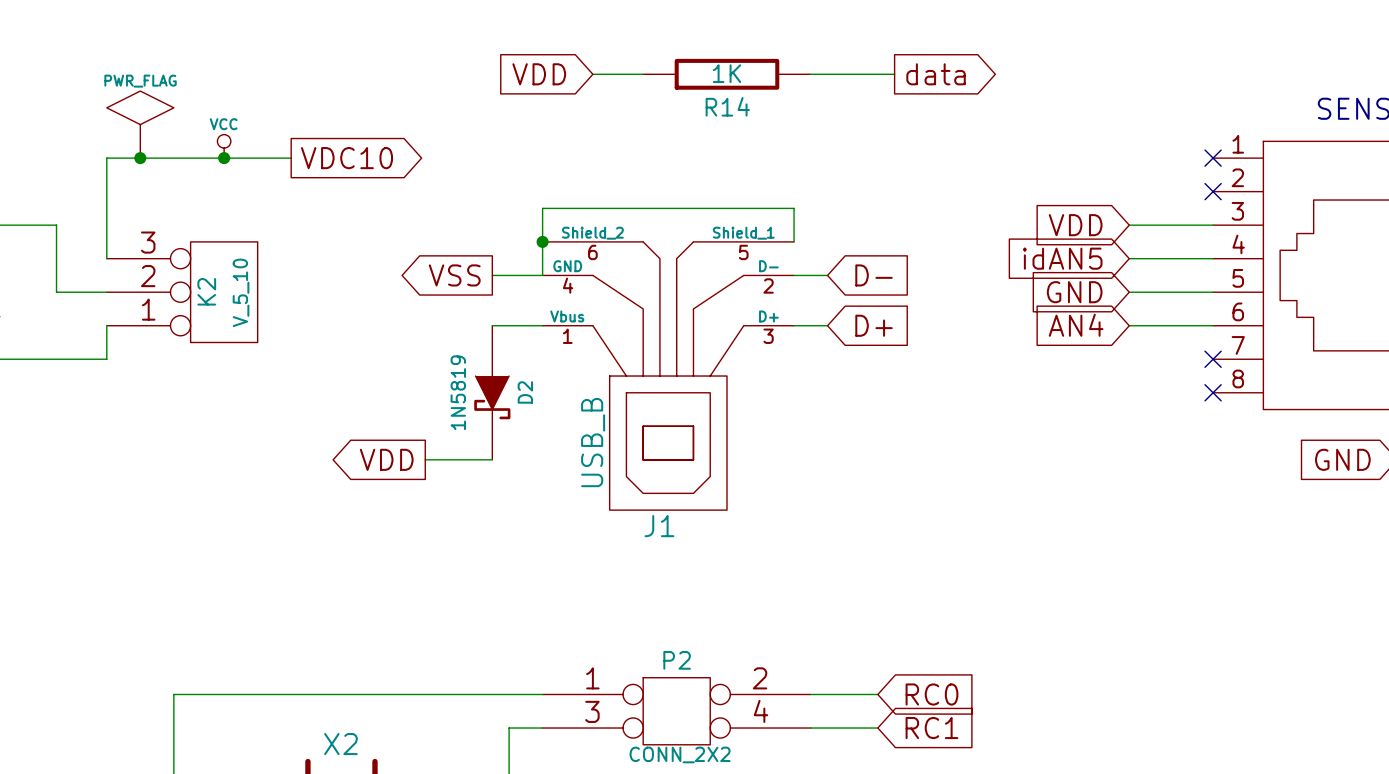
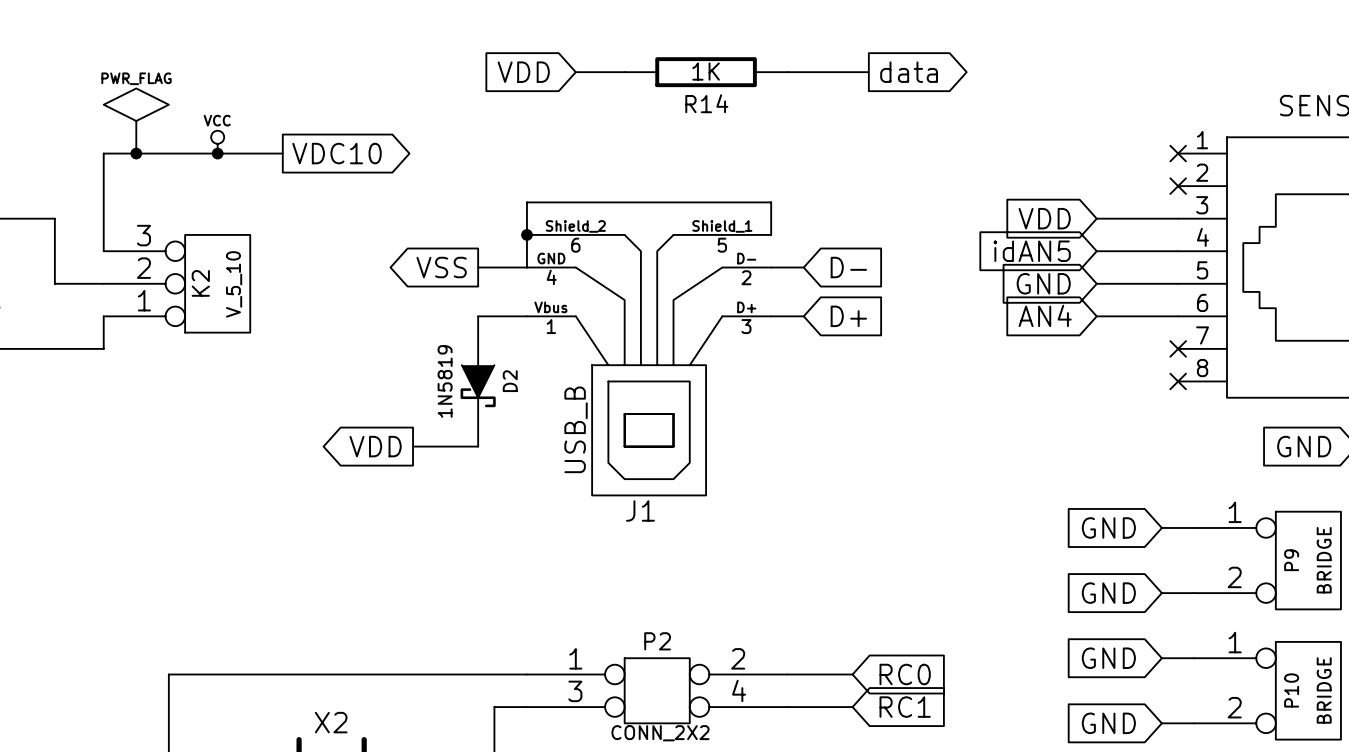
global label: none -> GND (1108, 527)
wire: none -> (1161, 527) (1194, 527)
P9: none -> BRIDGE (1267, 560)
global label: none -> GND (1108, 593)
wire: none -> (1161, 593) (1194, 593)
global label: none -> GND (1108, 658)
wire: none -> (1161, 658) (1194, 658)
P10: none -> BRIDGE (1267, 690)
global label: none -> GND (1108, 723)
wire: none -> (1161, 723) (1194, 723)

